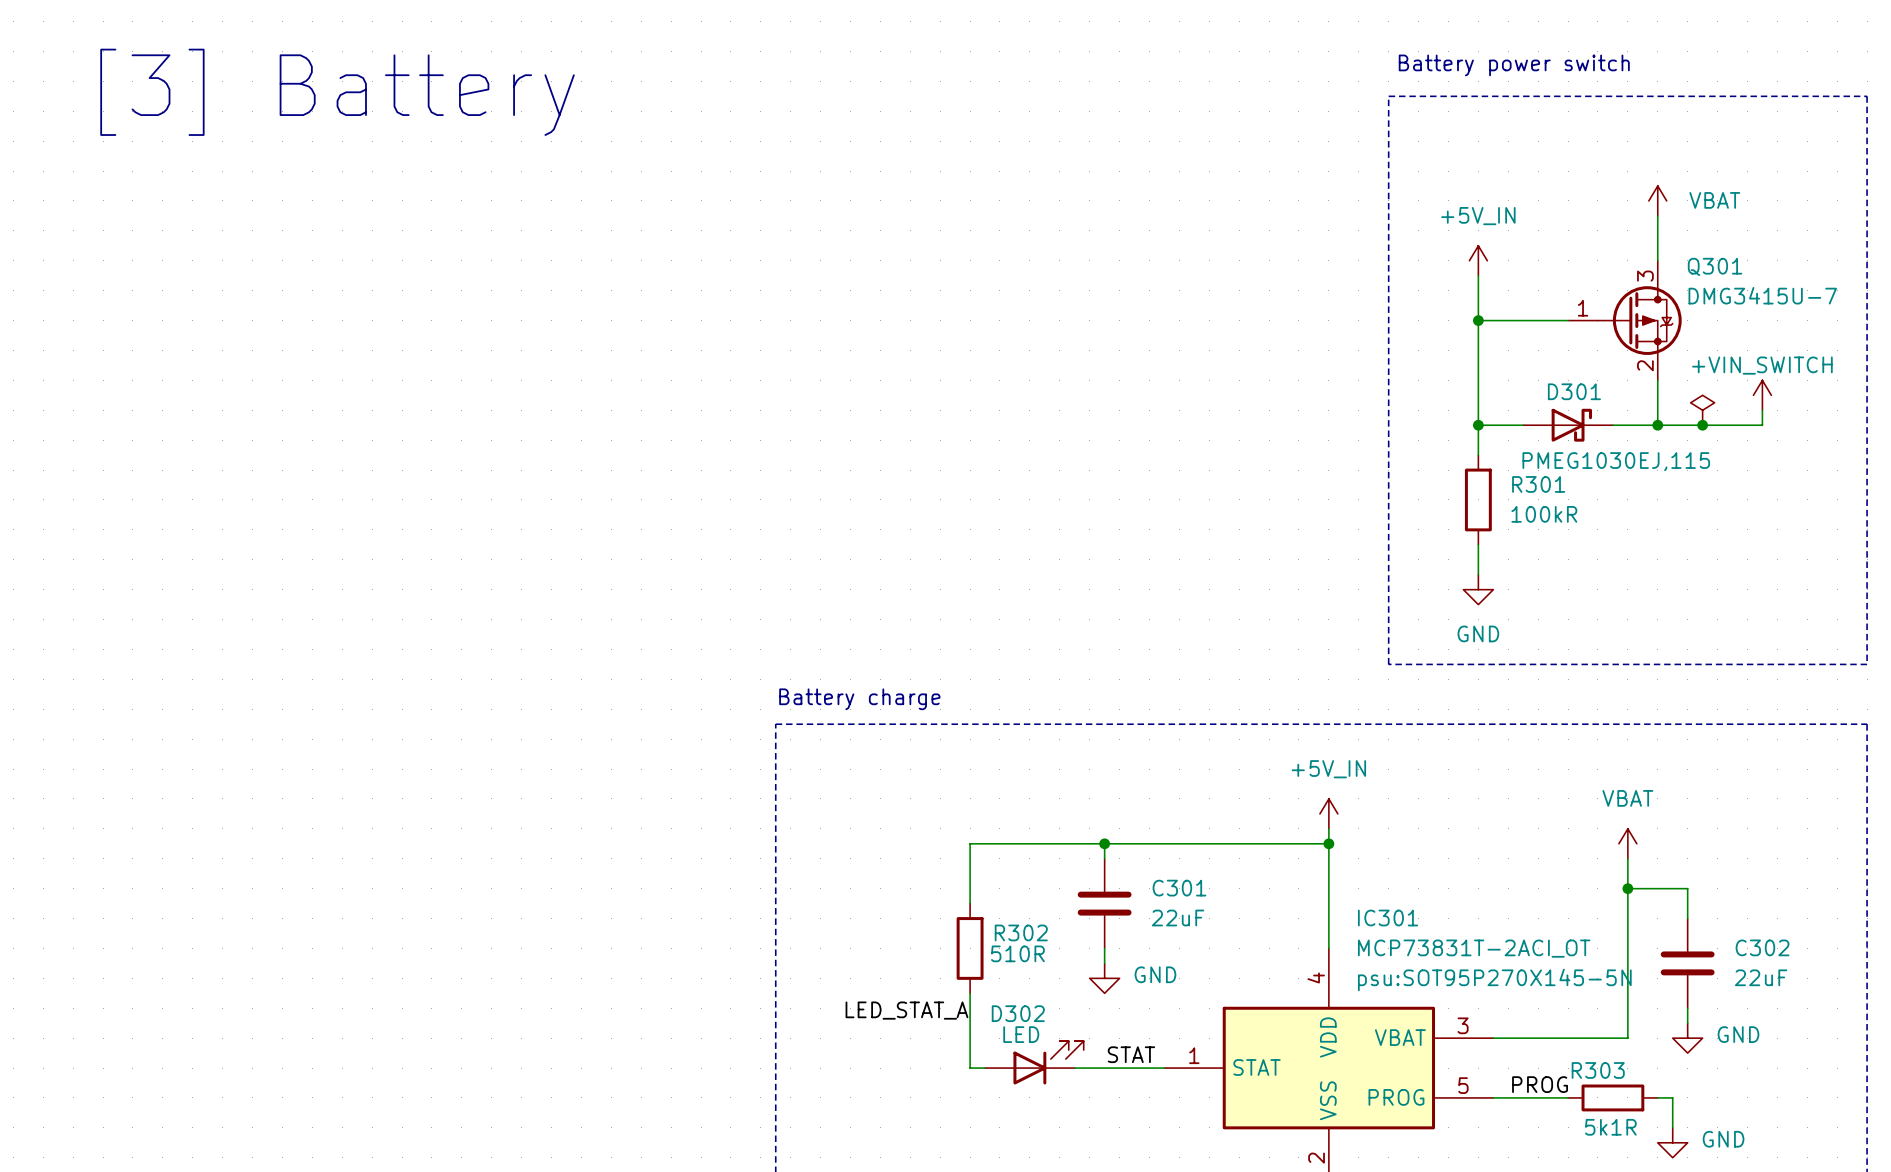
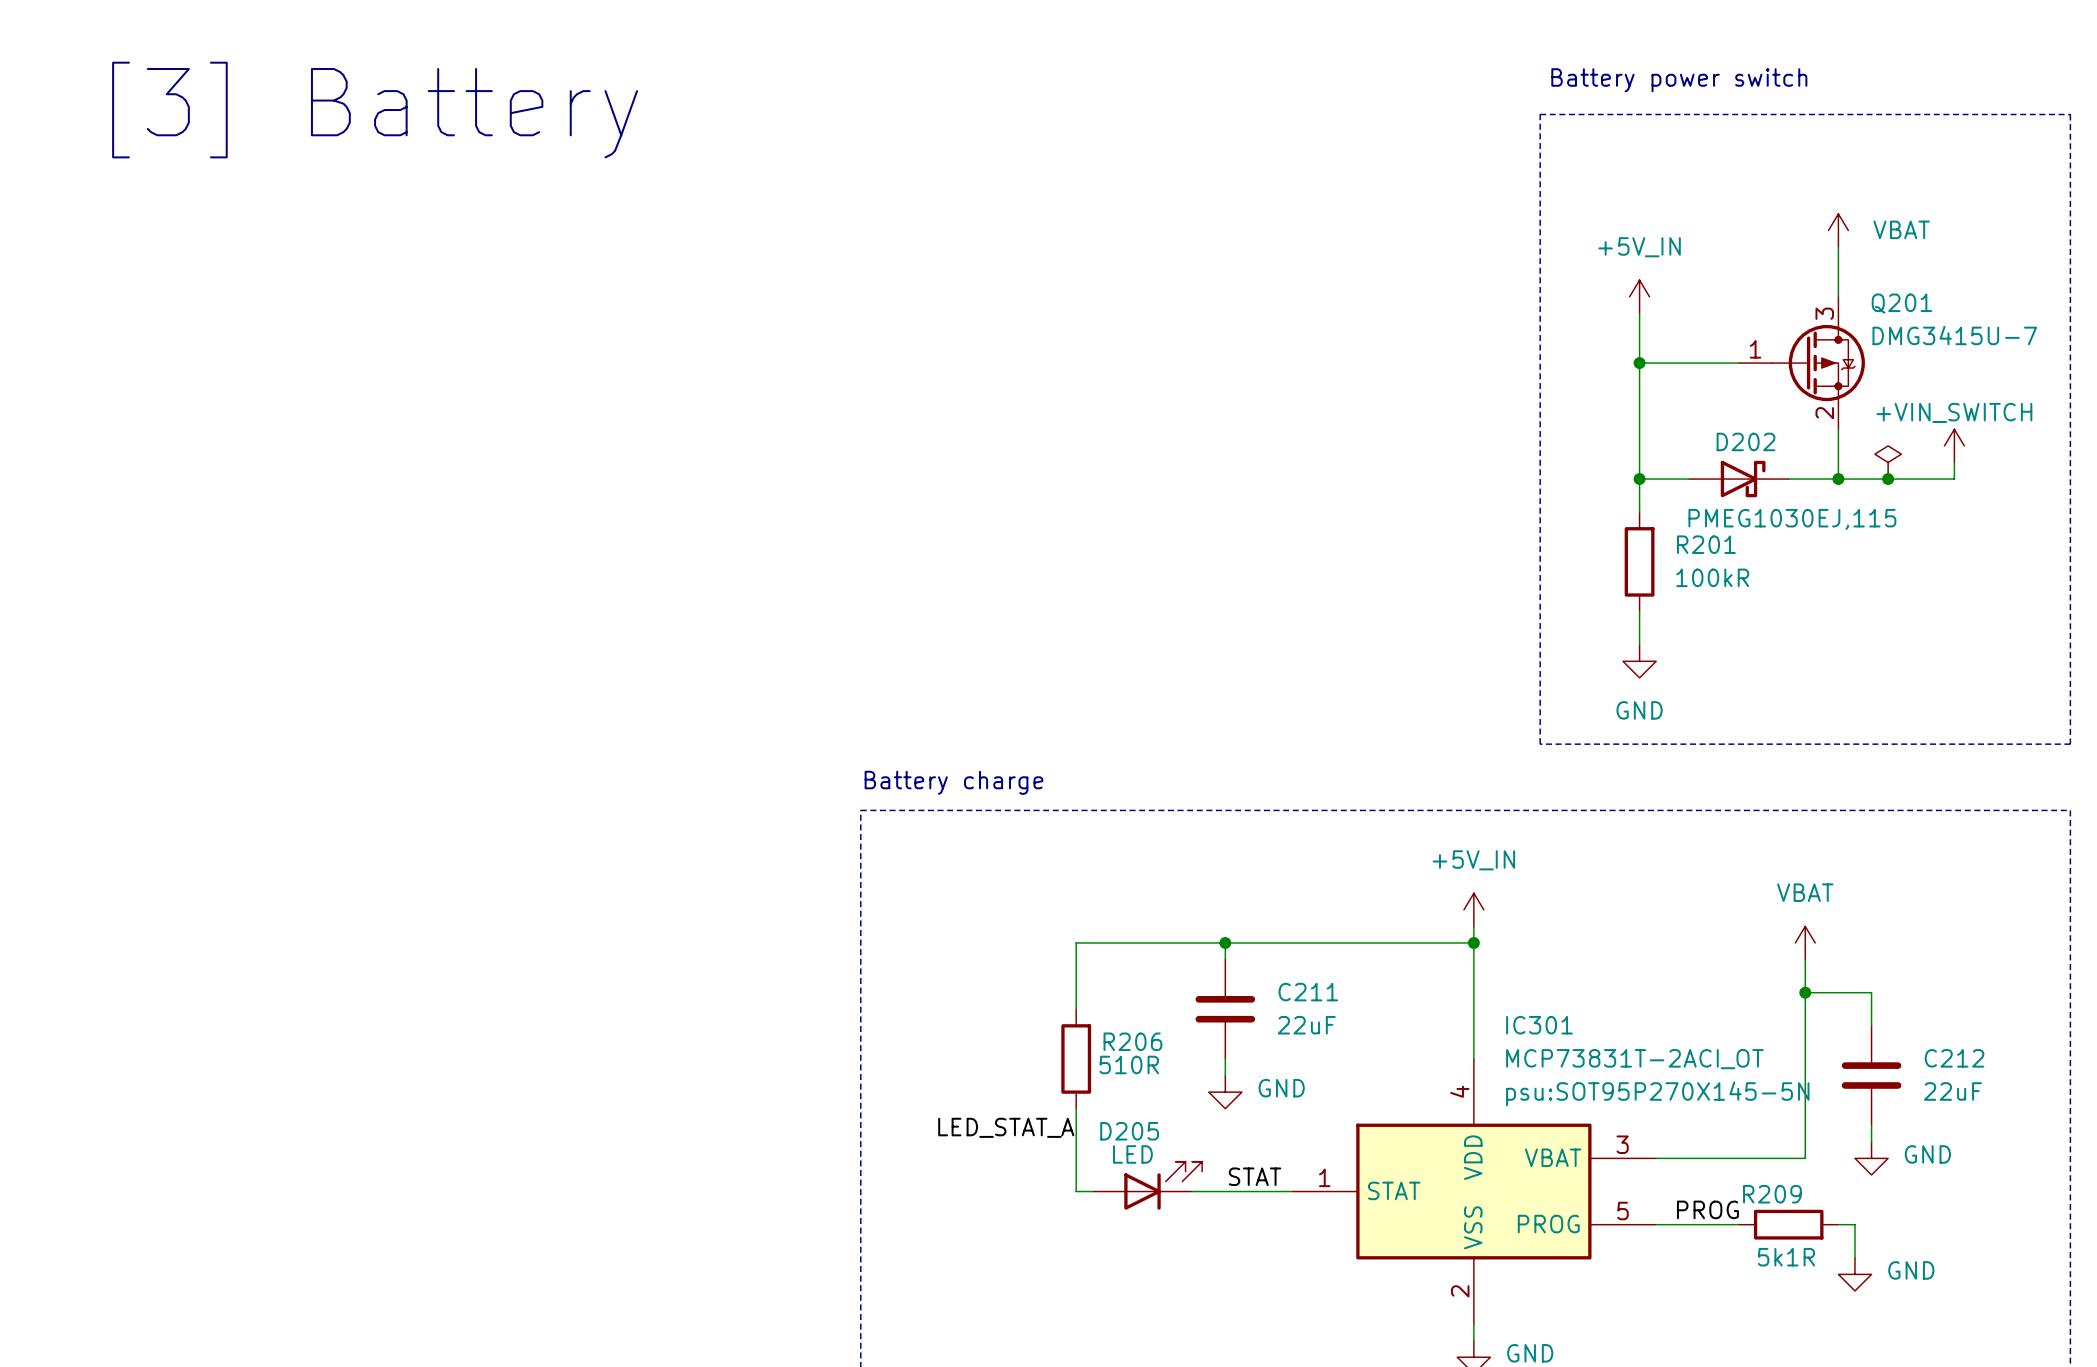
Q301 name: Q301 (1715, 266) -> Q201 (1901, 303)
D301 name: D301 (1574, 391) -> D202 (1746, 441)
R301 name: R301 (1538, 484) -> R201 (1706, 544)
C301 name: C301 (1179, 888) -> C211 (1308, 992)
R302 name: R302 (1021, 932) -> R206 (1132, 1041)
C302 name: C302 (1762, 947) -> C212 (1954, 1058)
D302 name: D302 (1018, 1013) -> D205 (1129, 1131)
R303 name: R303 (1598, 1070) -> R209 (1772, 1194)

